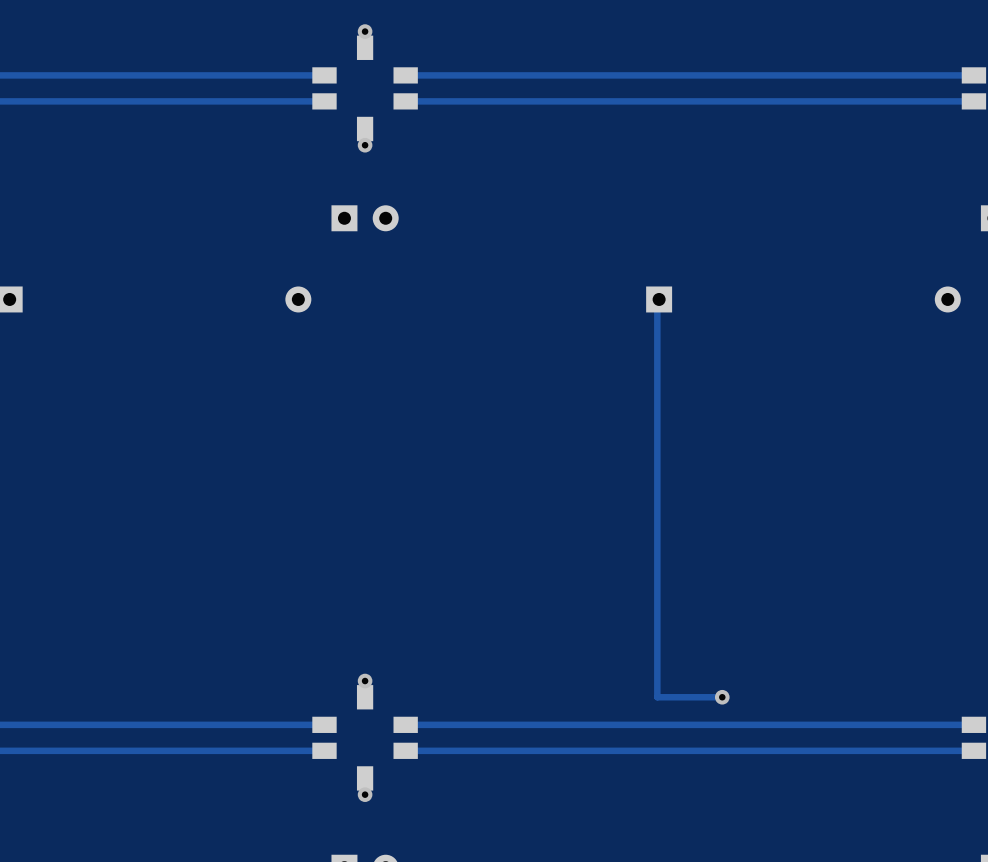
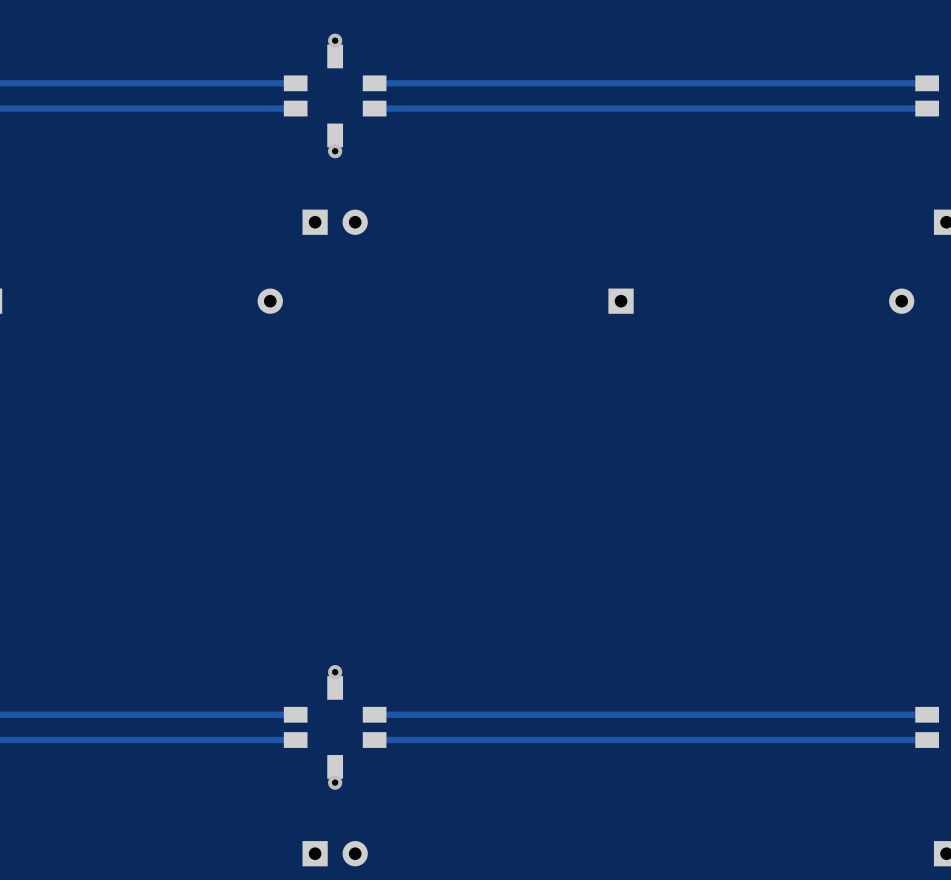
track: (659, 299) (657, 299) (657, 697) (722, 697) -> none
via: (722, 697) -> none

